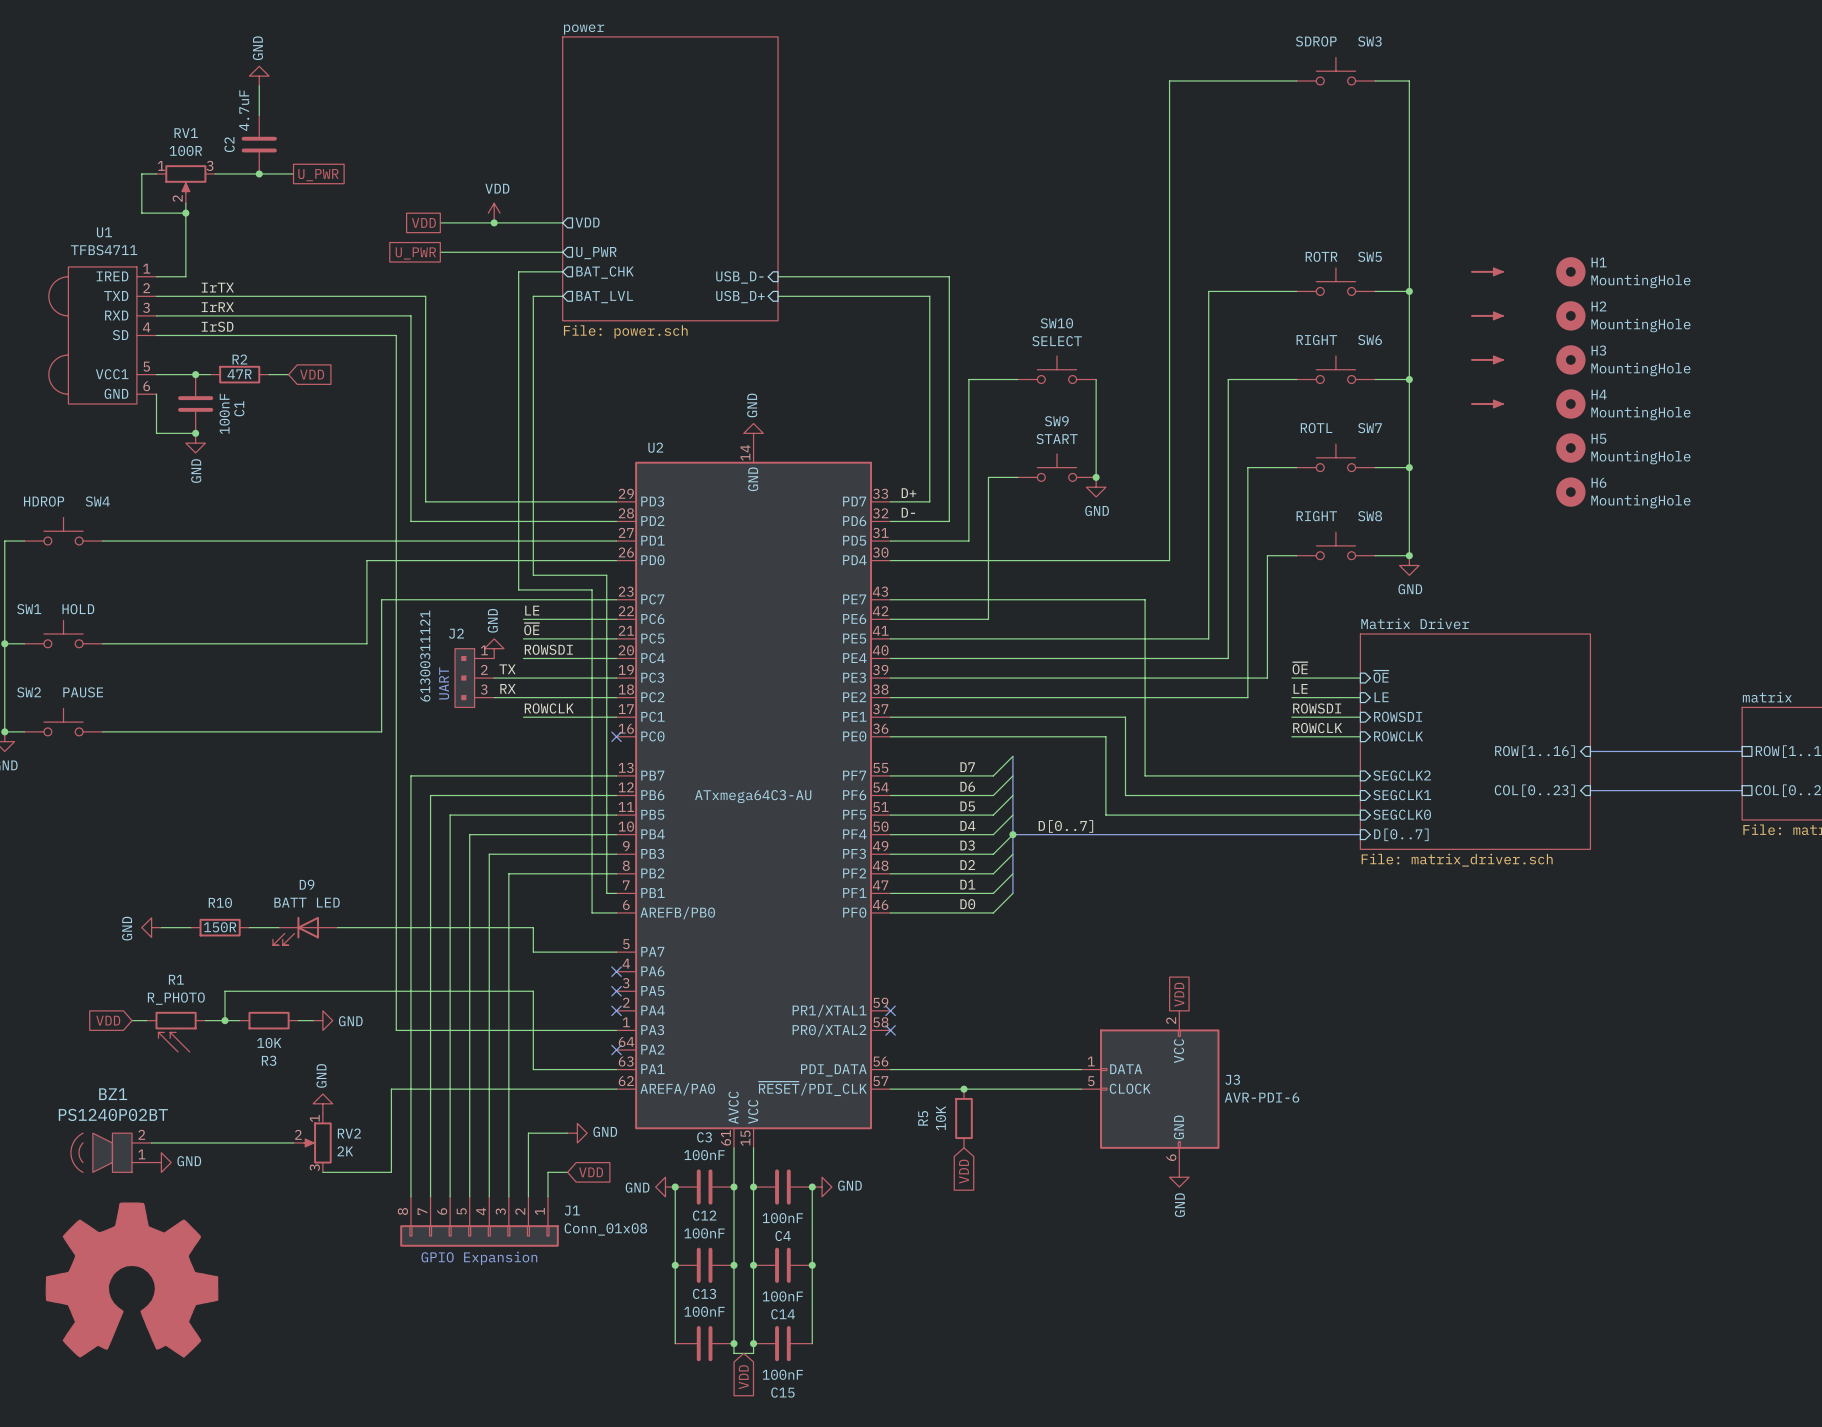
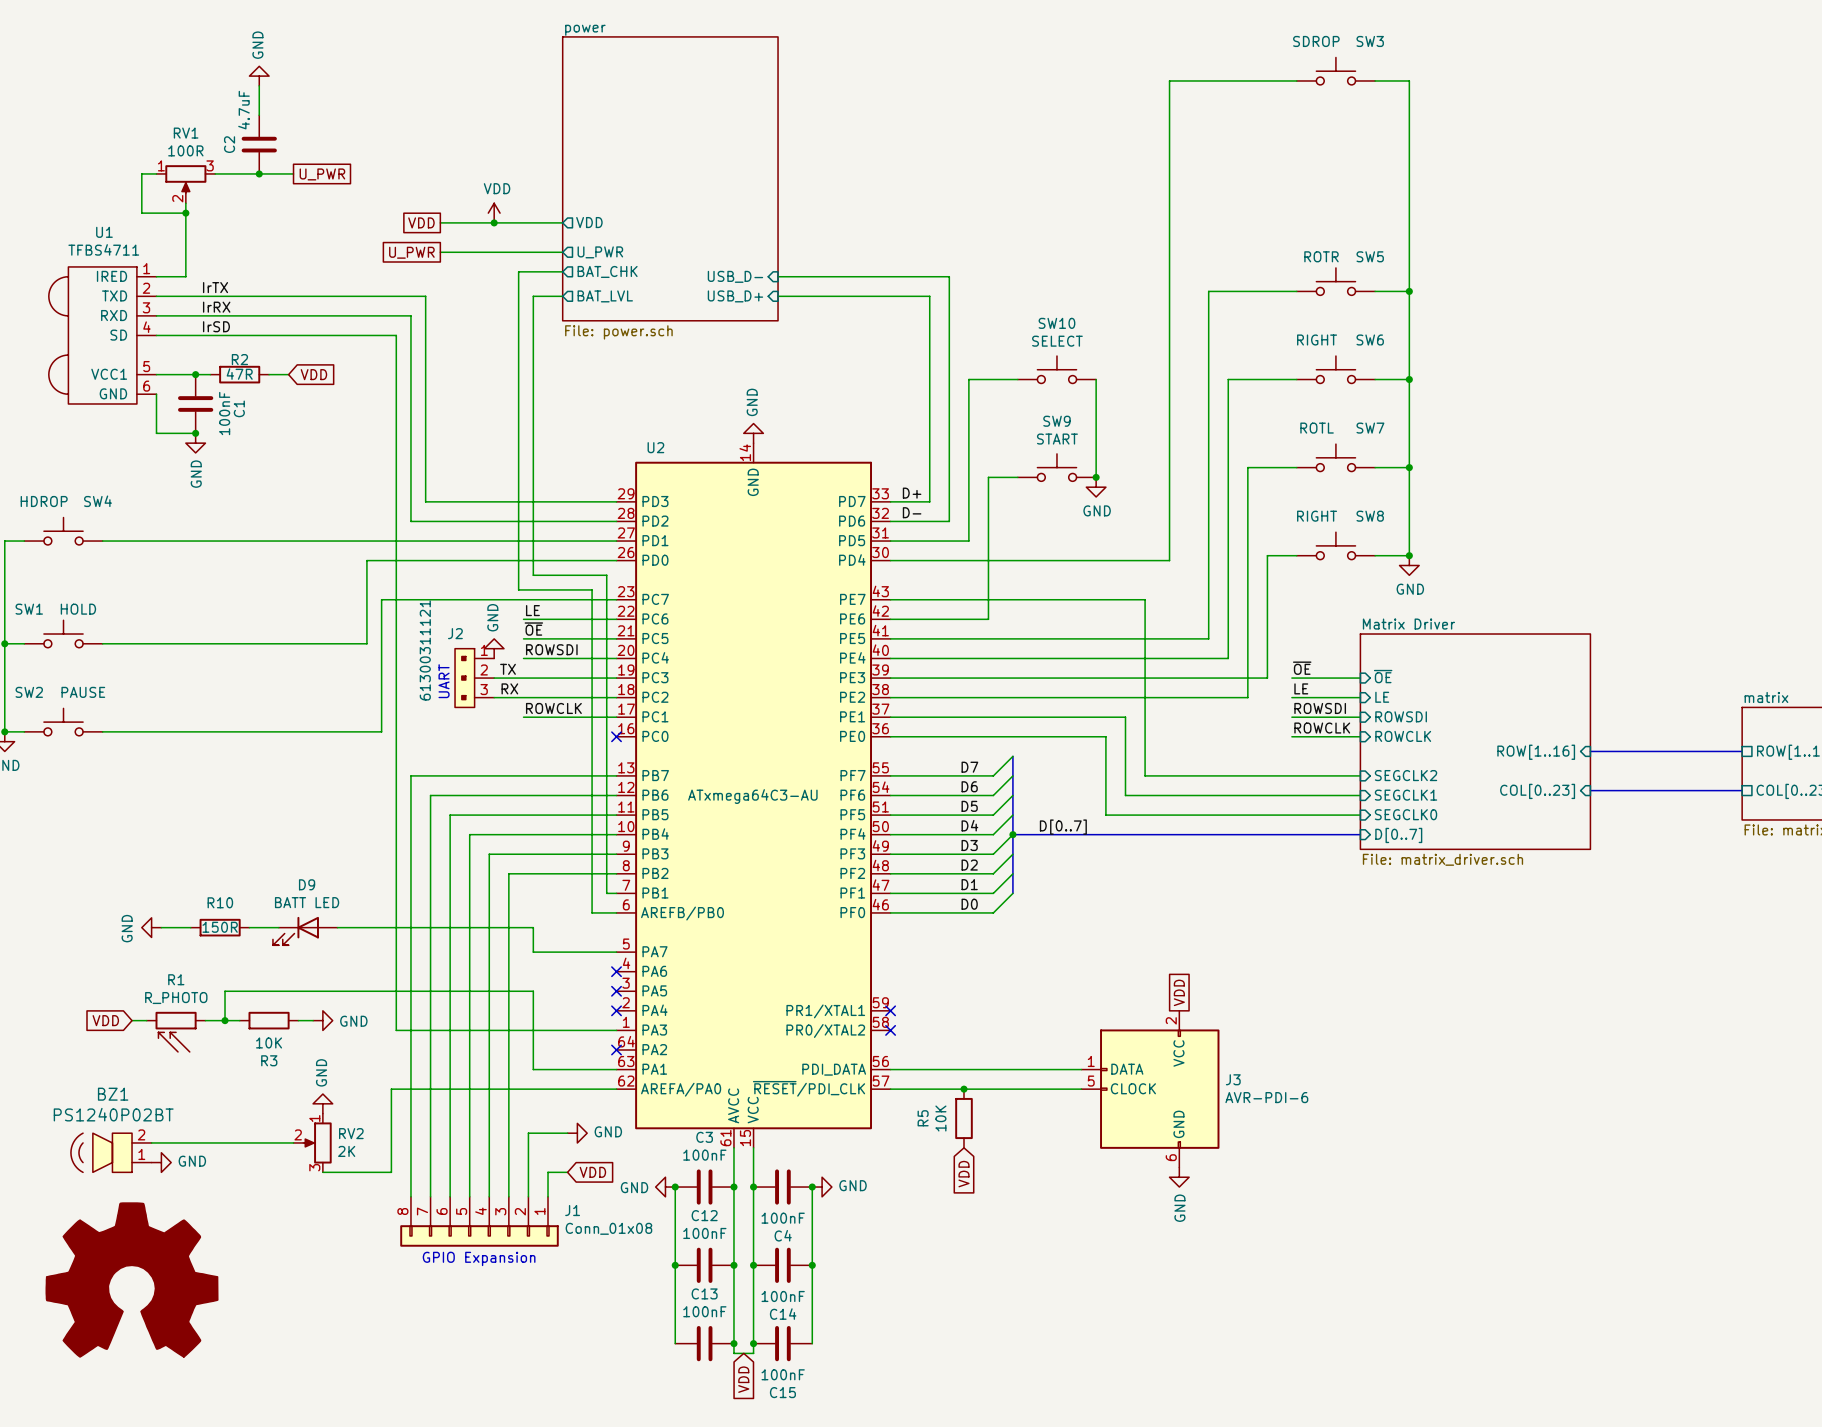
power symbol: (1487, 271) -> none
H1: MountingHole (1570, 271) -> none
power symbol: (1487, 315) -> none
H2: MountingHole (1570, 315) -> none
power symbol: (1487, 359) -> none
H3: MountingHole (1570, 359) -> none
power symbol: (1487, 403) -> none
H4: MountingHole (1570, 403) -> none
H5: MountingHole (1570, 448) -> none
H6: MountingHole (1570, 492) -> none

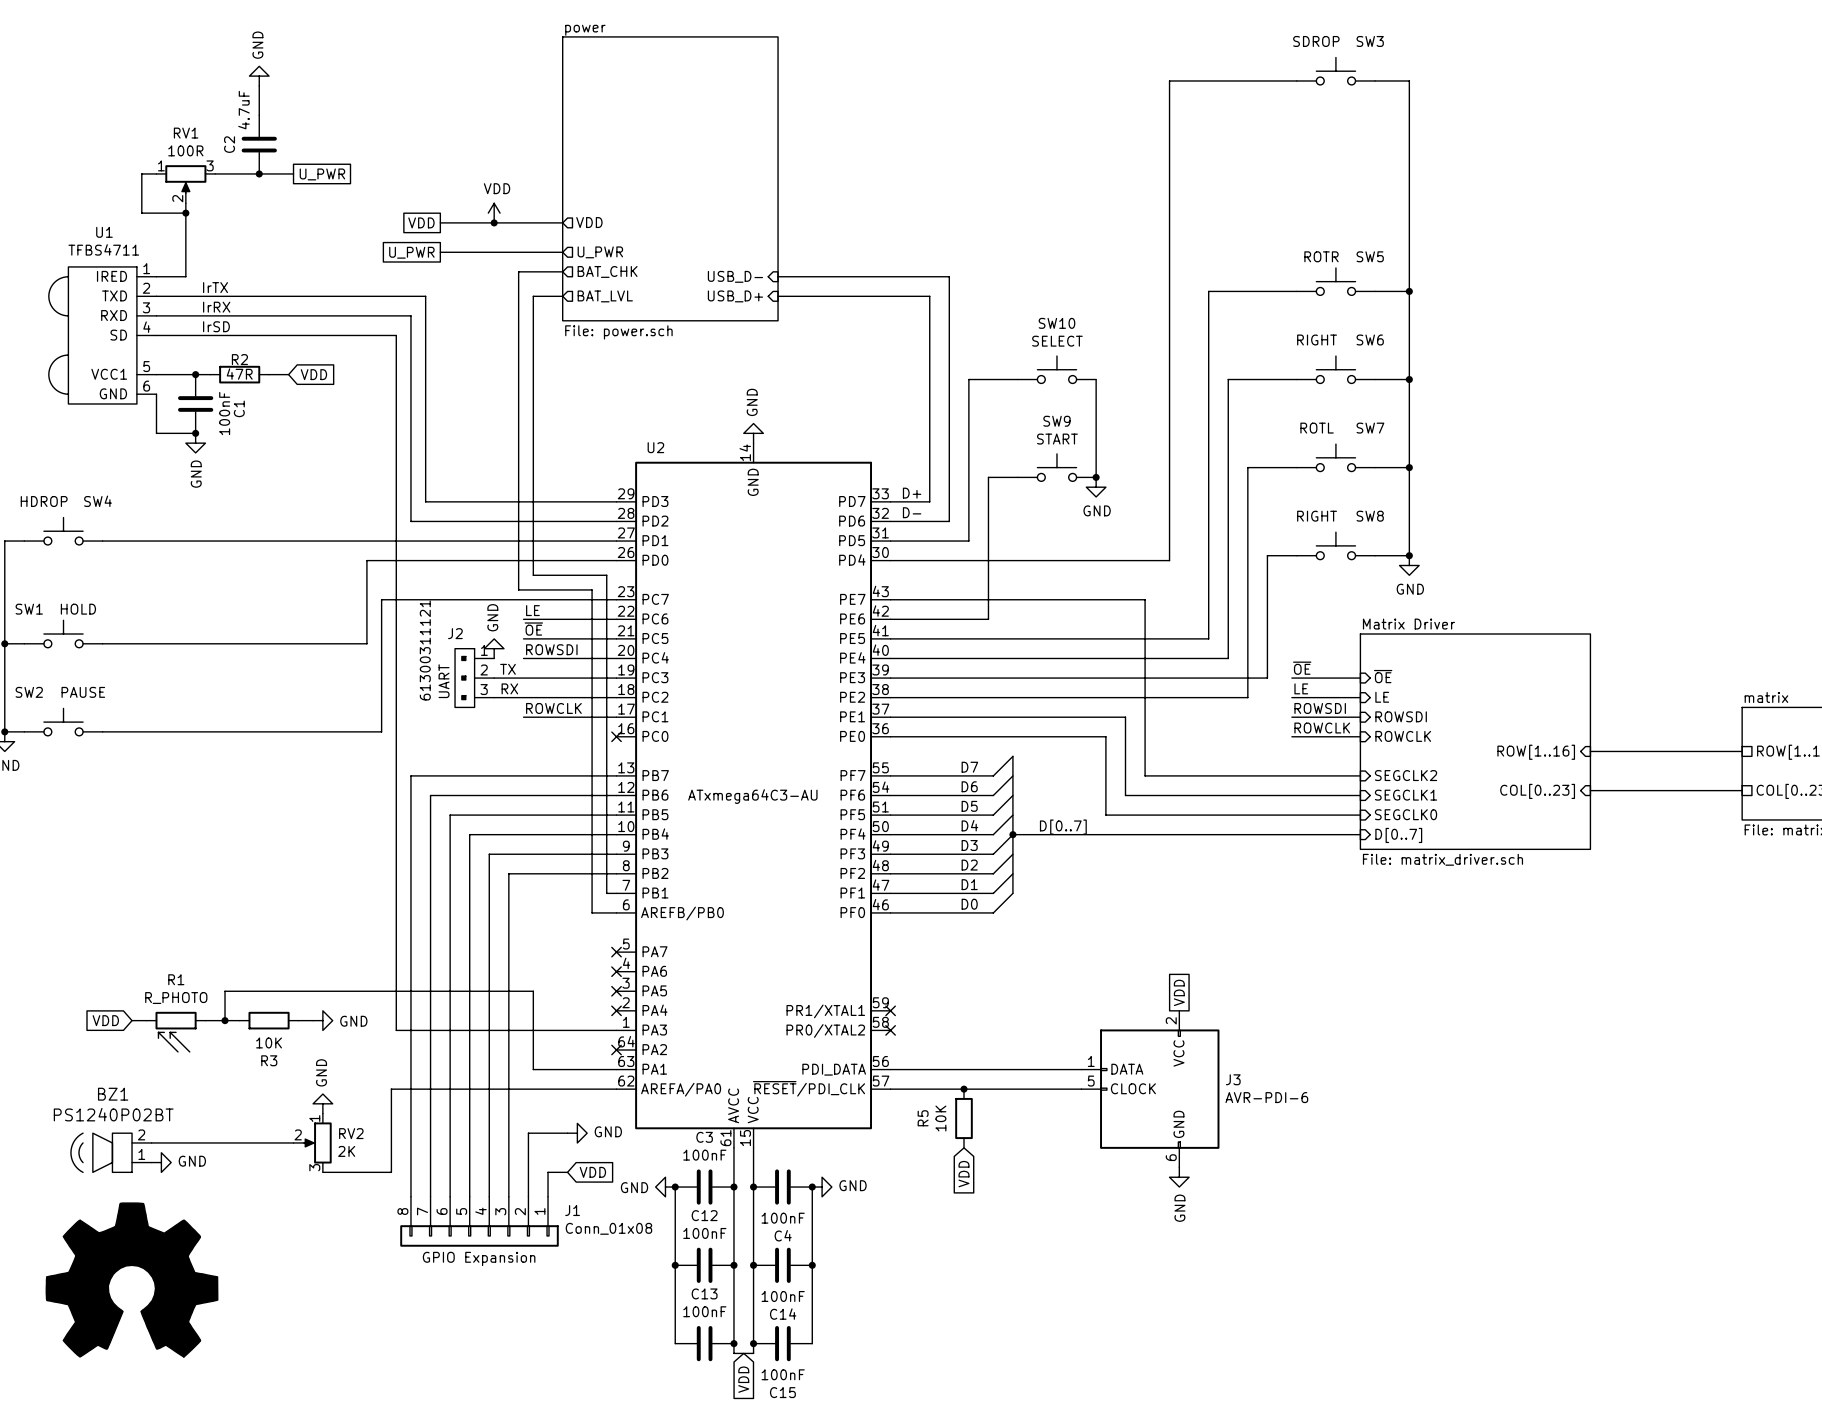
power symbol: GND (151, 927) -> none
wire: (161, 927) (190, 927) -> none
R10: 150R (220, 927) -> none
wire: (249, 927) (278, 927) -> none
wire: (337, 927) (533, 927) (533, 952) (616, 952) -> none
D9: BATT LED (305, 931) -> none
no-connect mark: none -> (616, 952)

